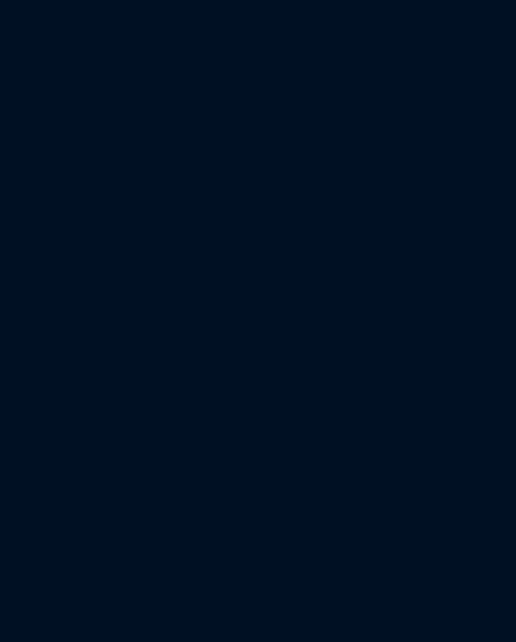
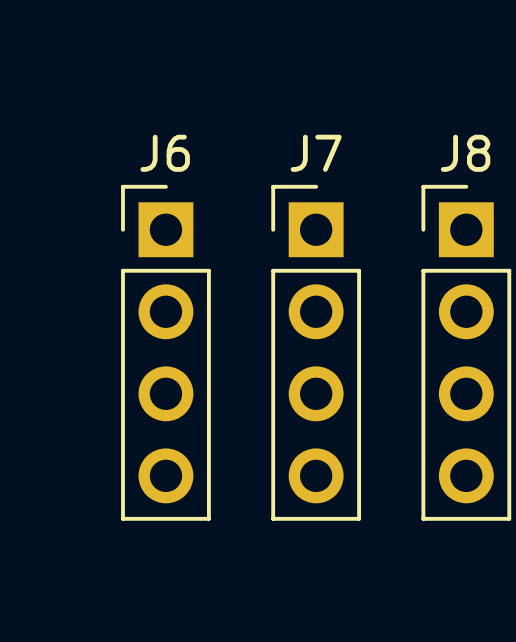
J6: none -> (165, 352)
J7: none -> (316, 352)
J8: none -> (466, 352)

